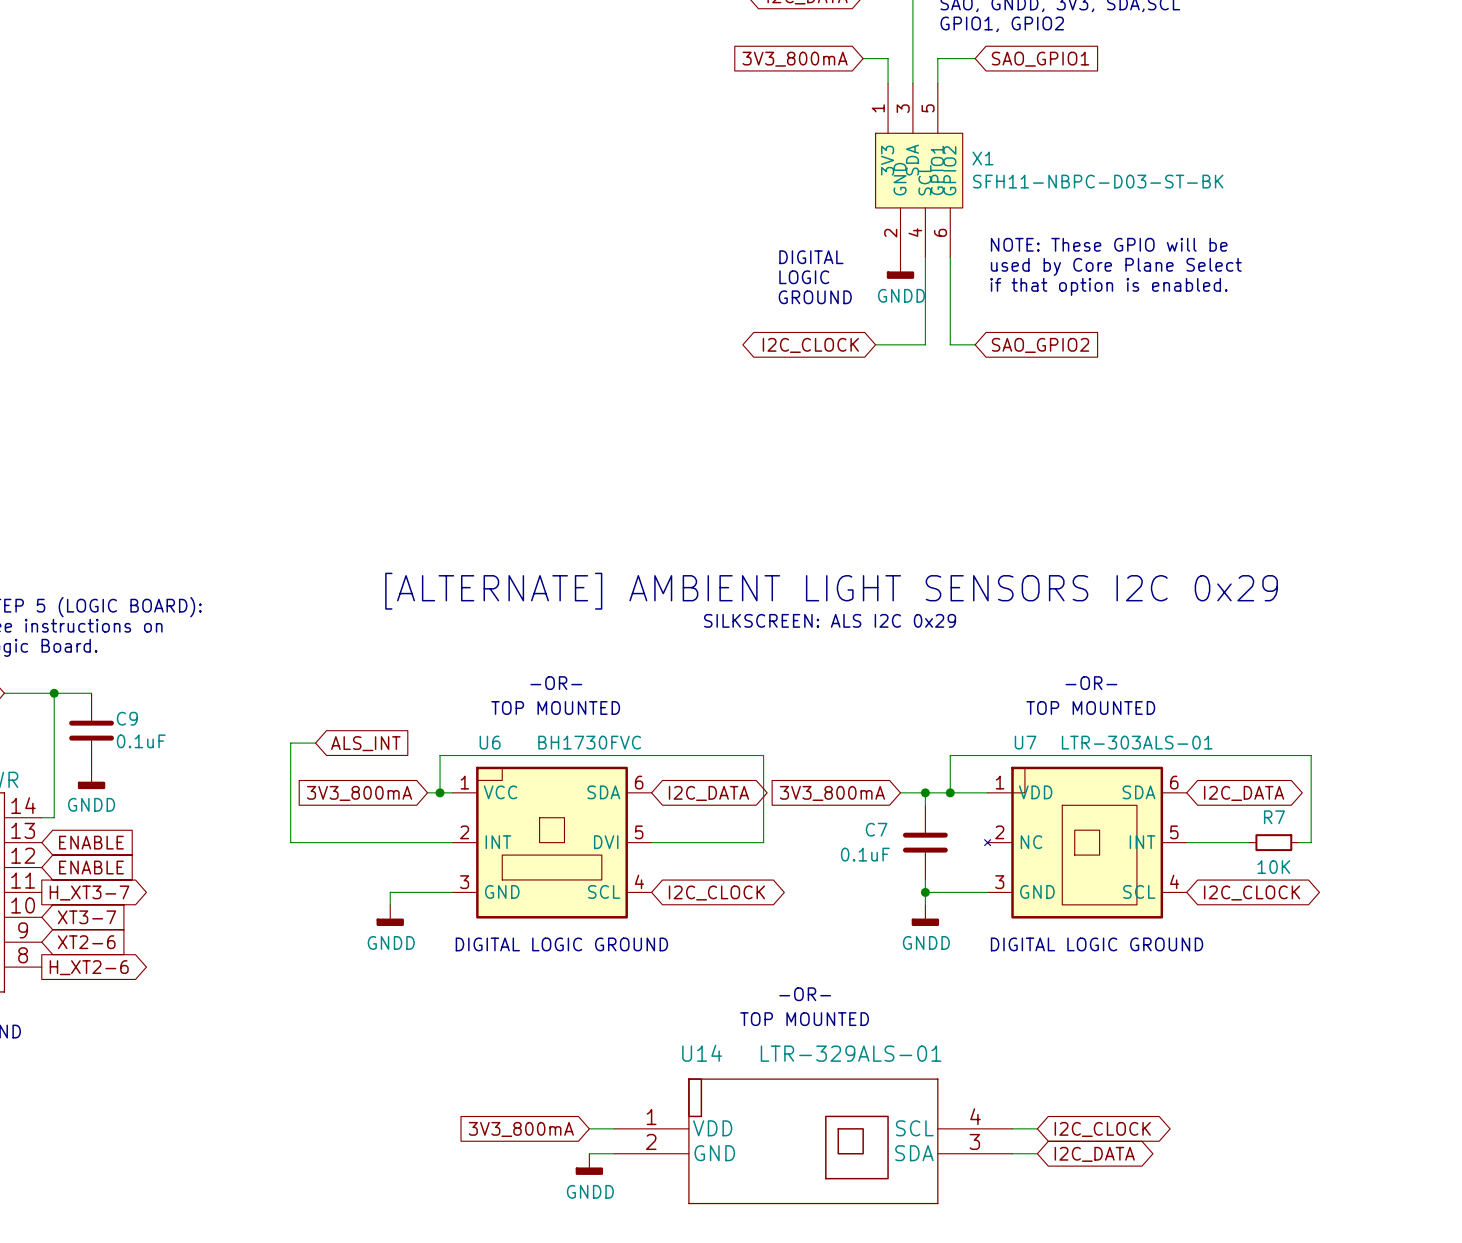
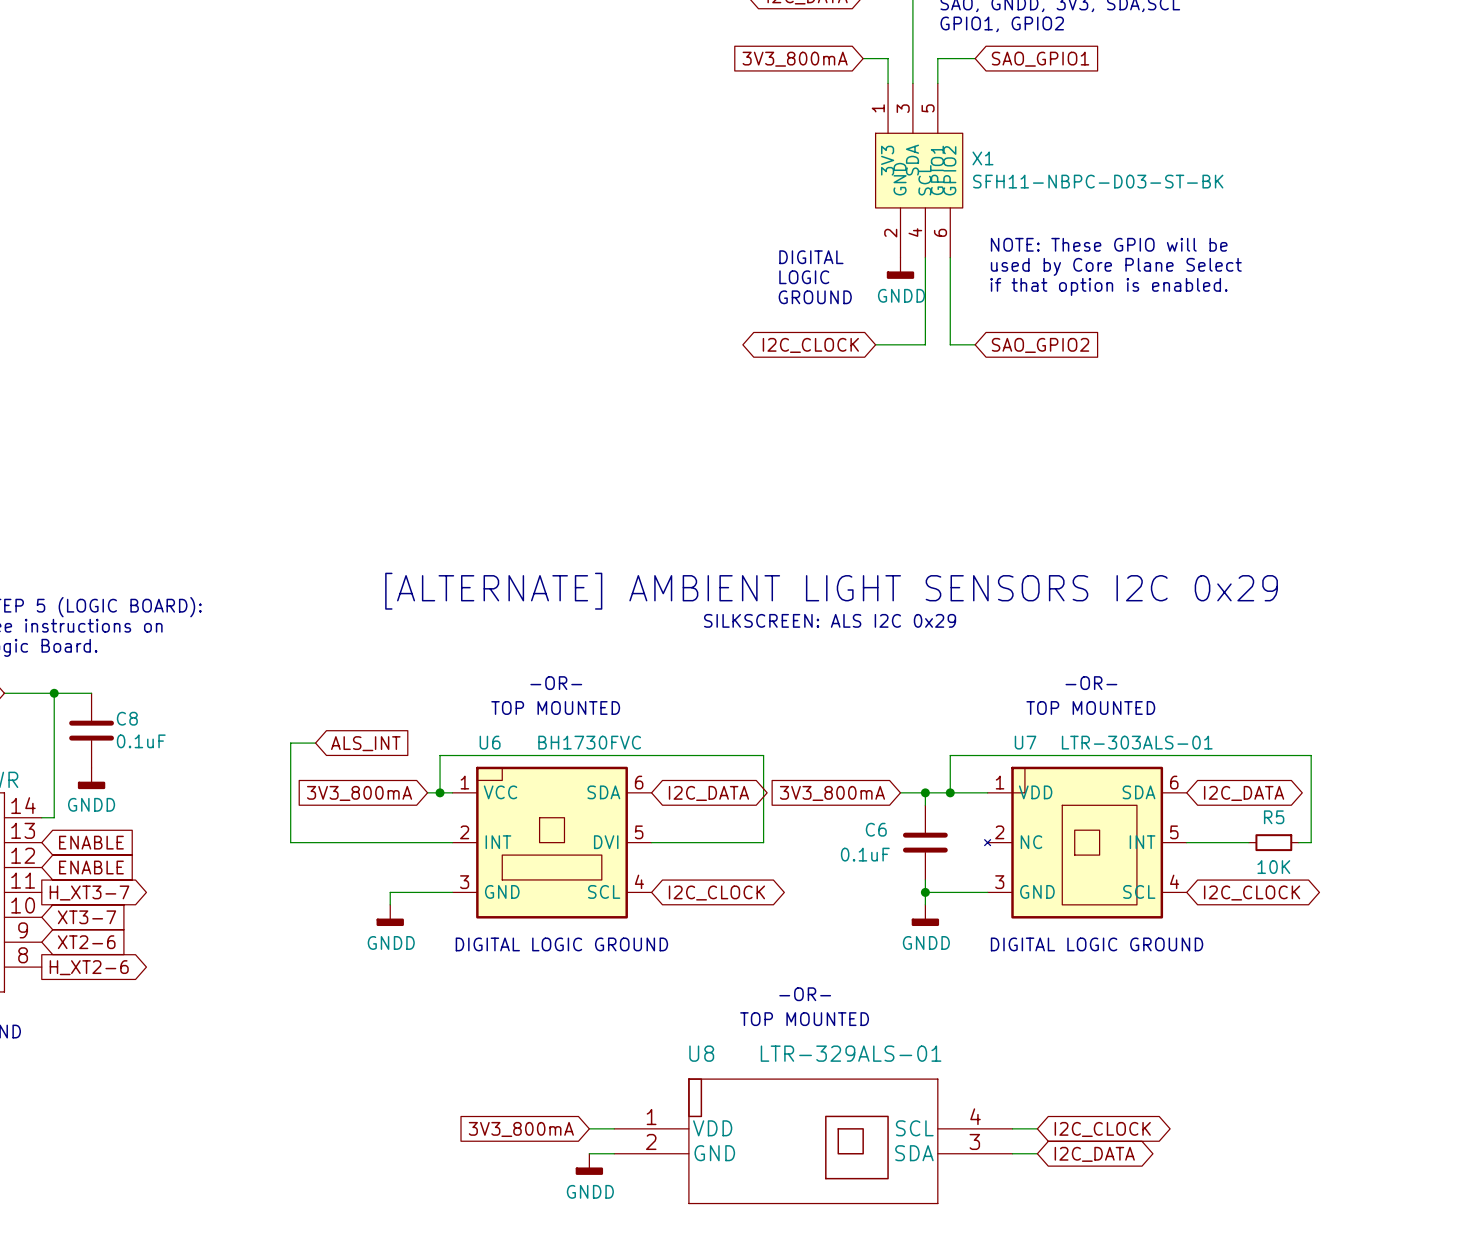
C9 name: C9 (127, 718) -> C8 (127, 718)
R7 name: R7 (1274, 817) -> R5 (1274, 817)
C7 name: C7 (876, 829) -> C6 (876, 829)
U14 name: U14 (702, 1053) -> U8 (701, 1053)

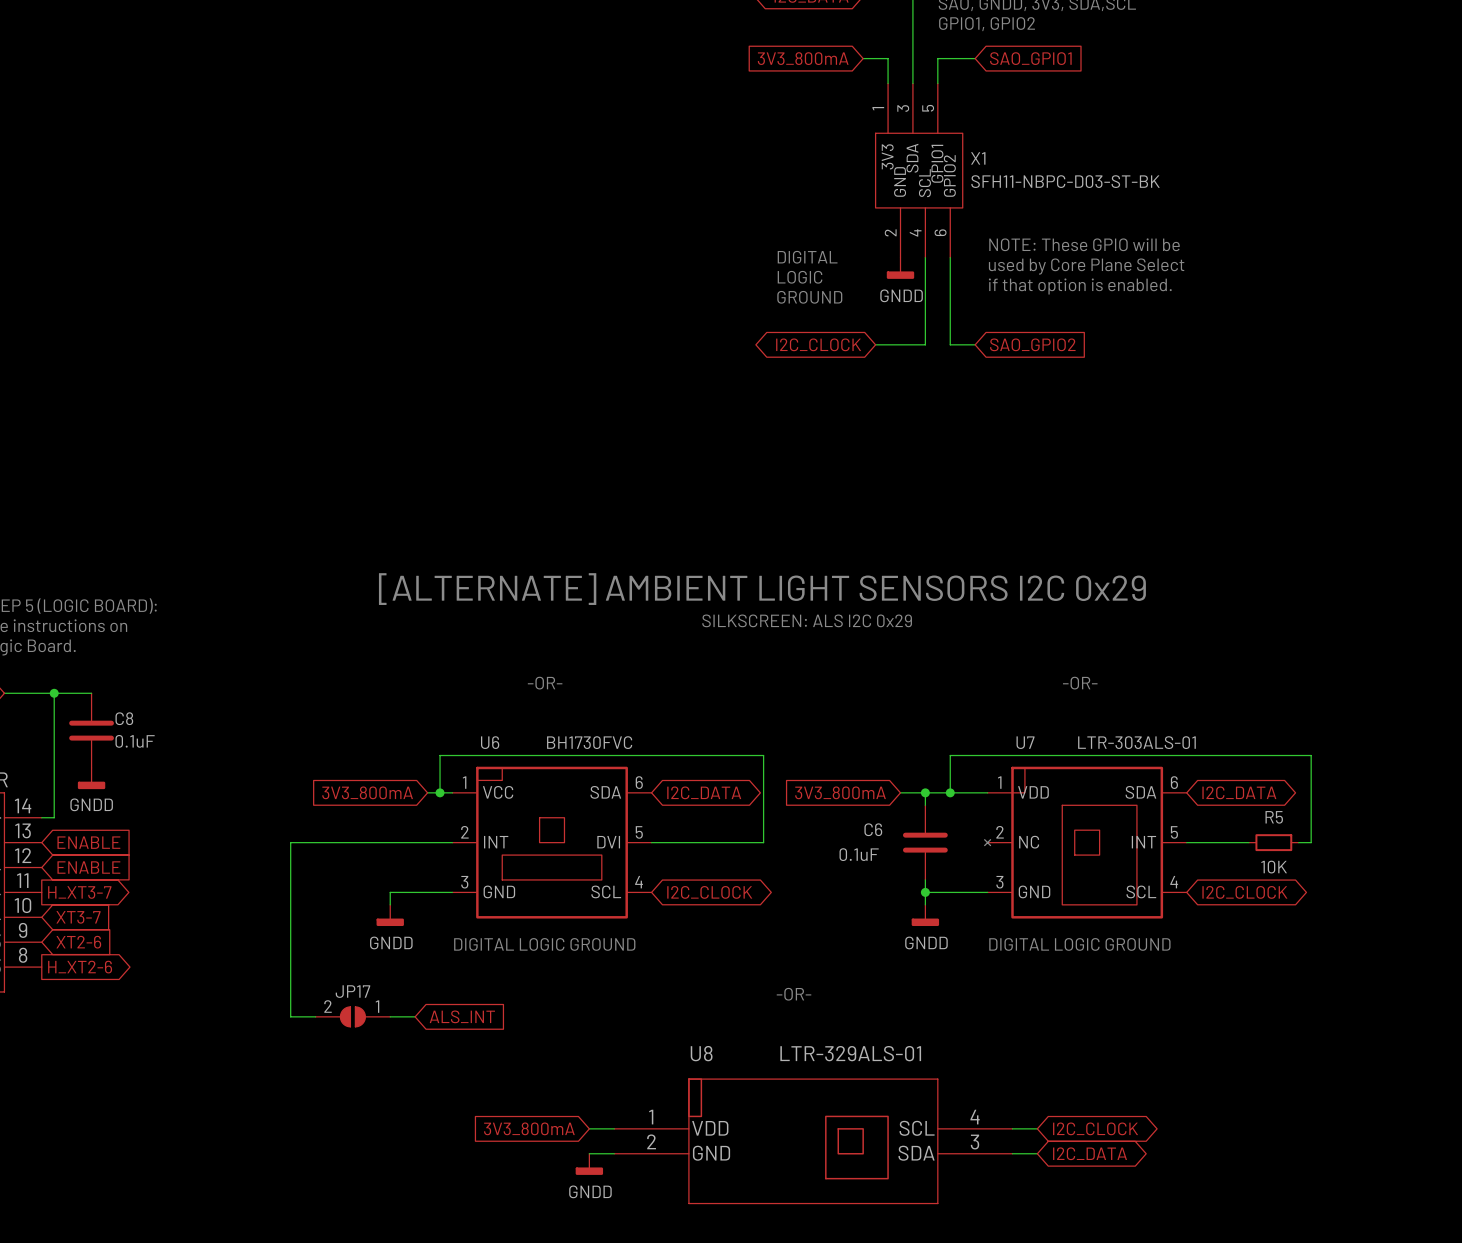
text: TOP MOUNTED (555, 707) -> none
text: TOP MOUNTED (1090, 707) -> none
wire: (315, 743) (290, 743) (290, 842) -> (315, 1016) (290, 1016) (290, 842)
global label: ALS_INT (365, 743) -> none
JP17: none -> (352, 1016)
wire: none -> (390, 1016) (415, 1016)
global label: none -> ALS_INT (462, 1016)
text: TOP MOUNTED (804, 1019) -> none

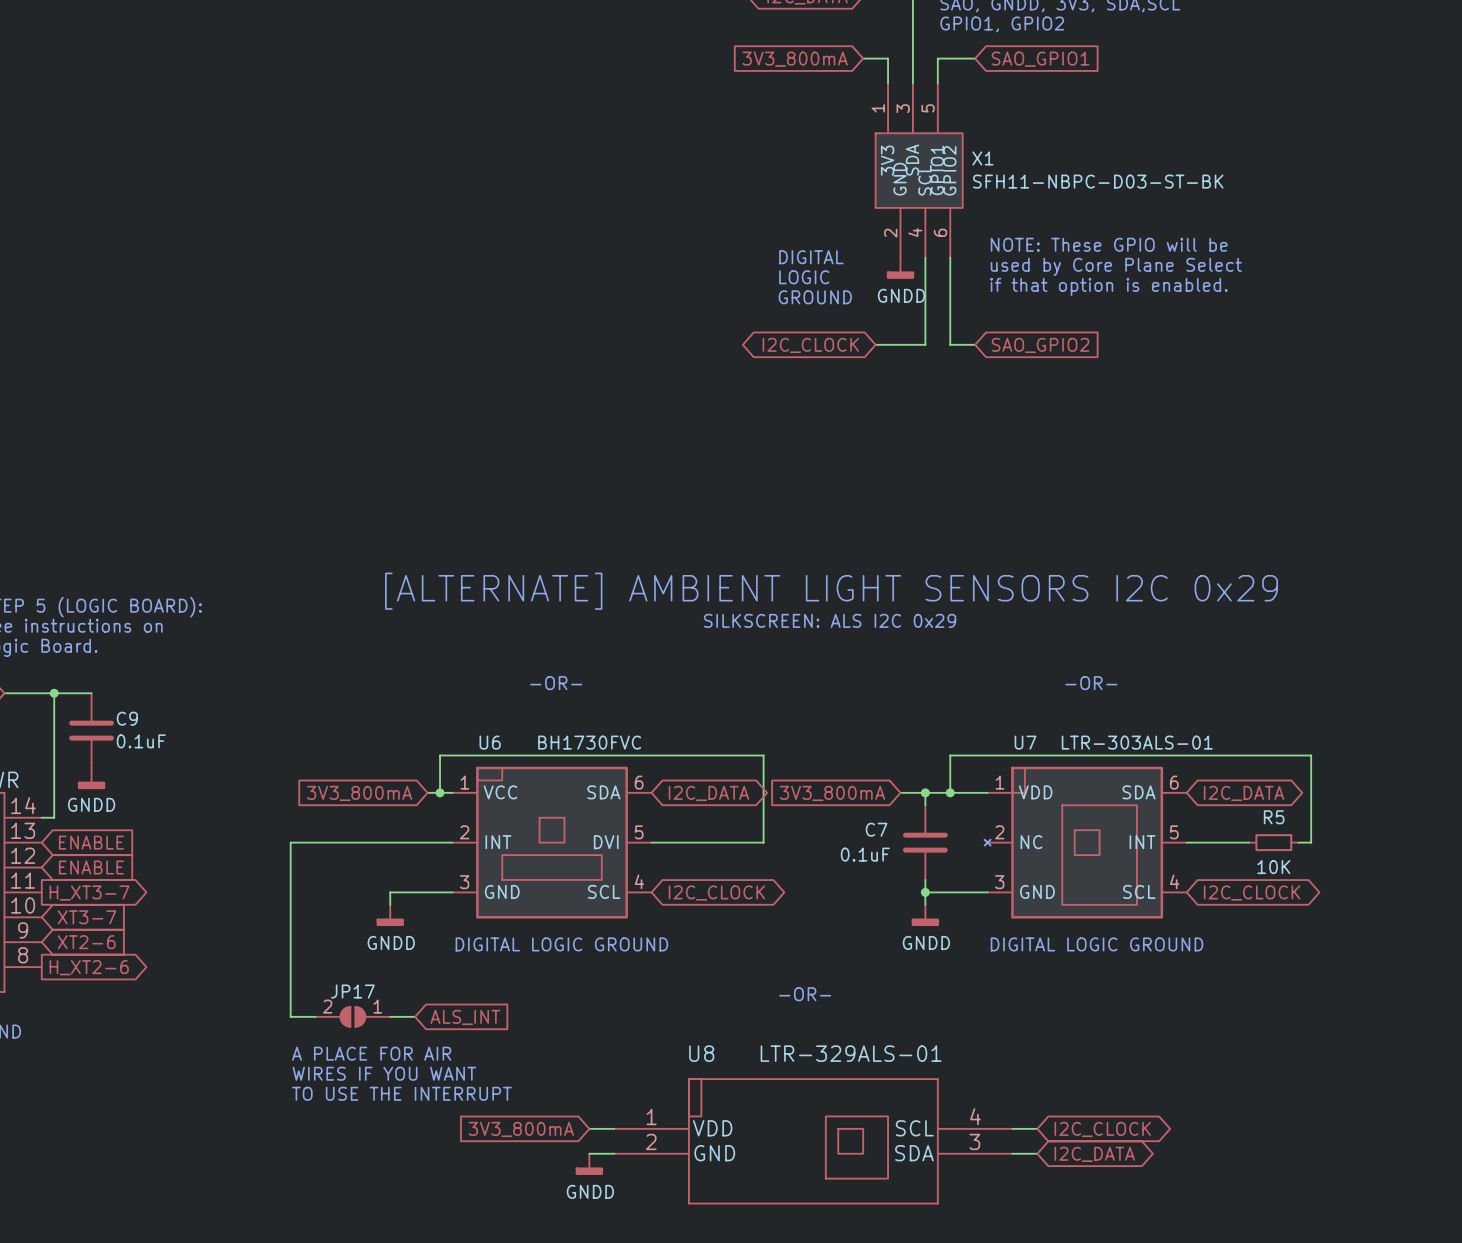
C8 name: C8 (124, 718) -> C9 (127, 718)
C6 name: C6 (873, 829) -> C7 (876, 829)
text: none -> A PLACE FOR AIR (371, 1053)
text: none -> WIRES IF YOU WANT (384, 1073)
text: none -> TO USE THE INTERRUPT (401, 1093)

